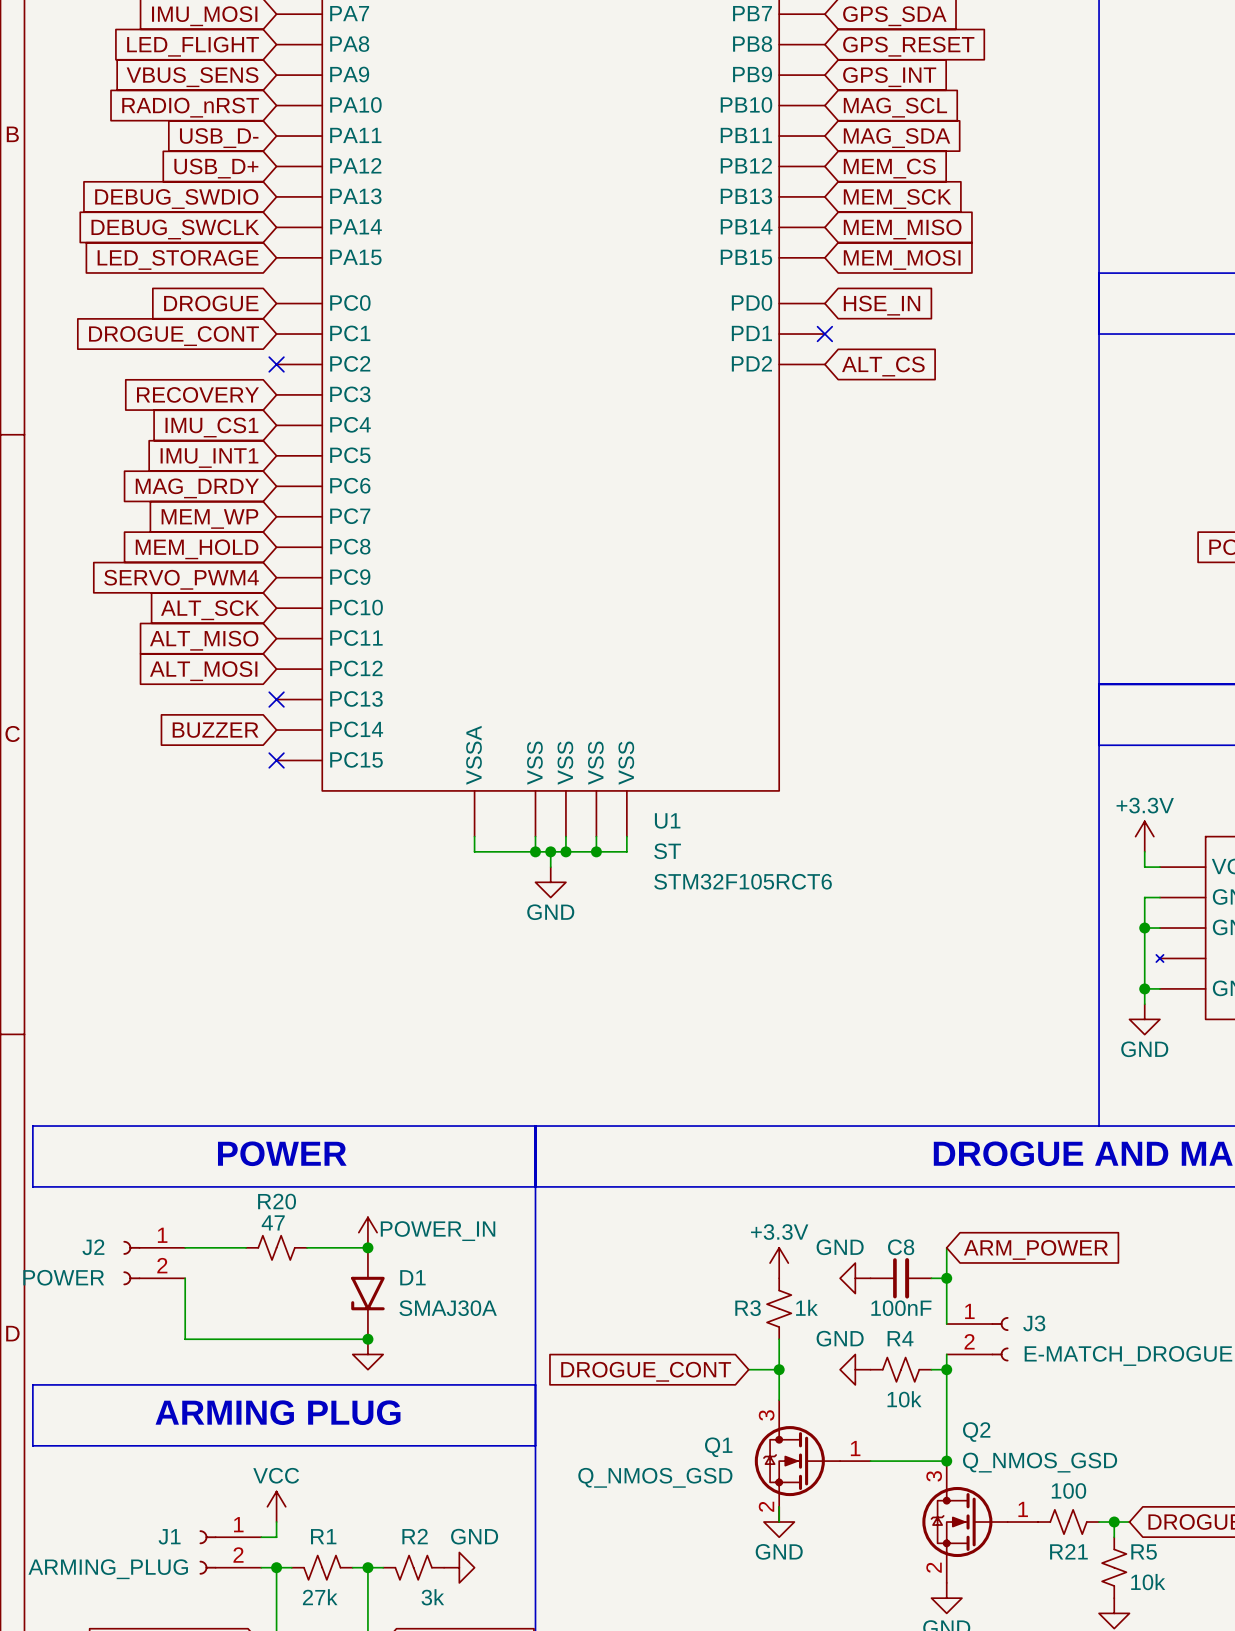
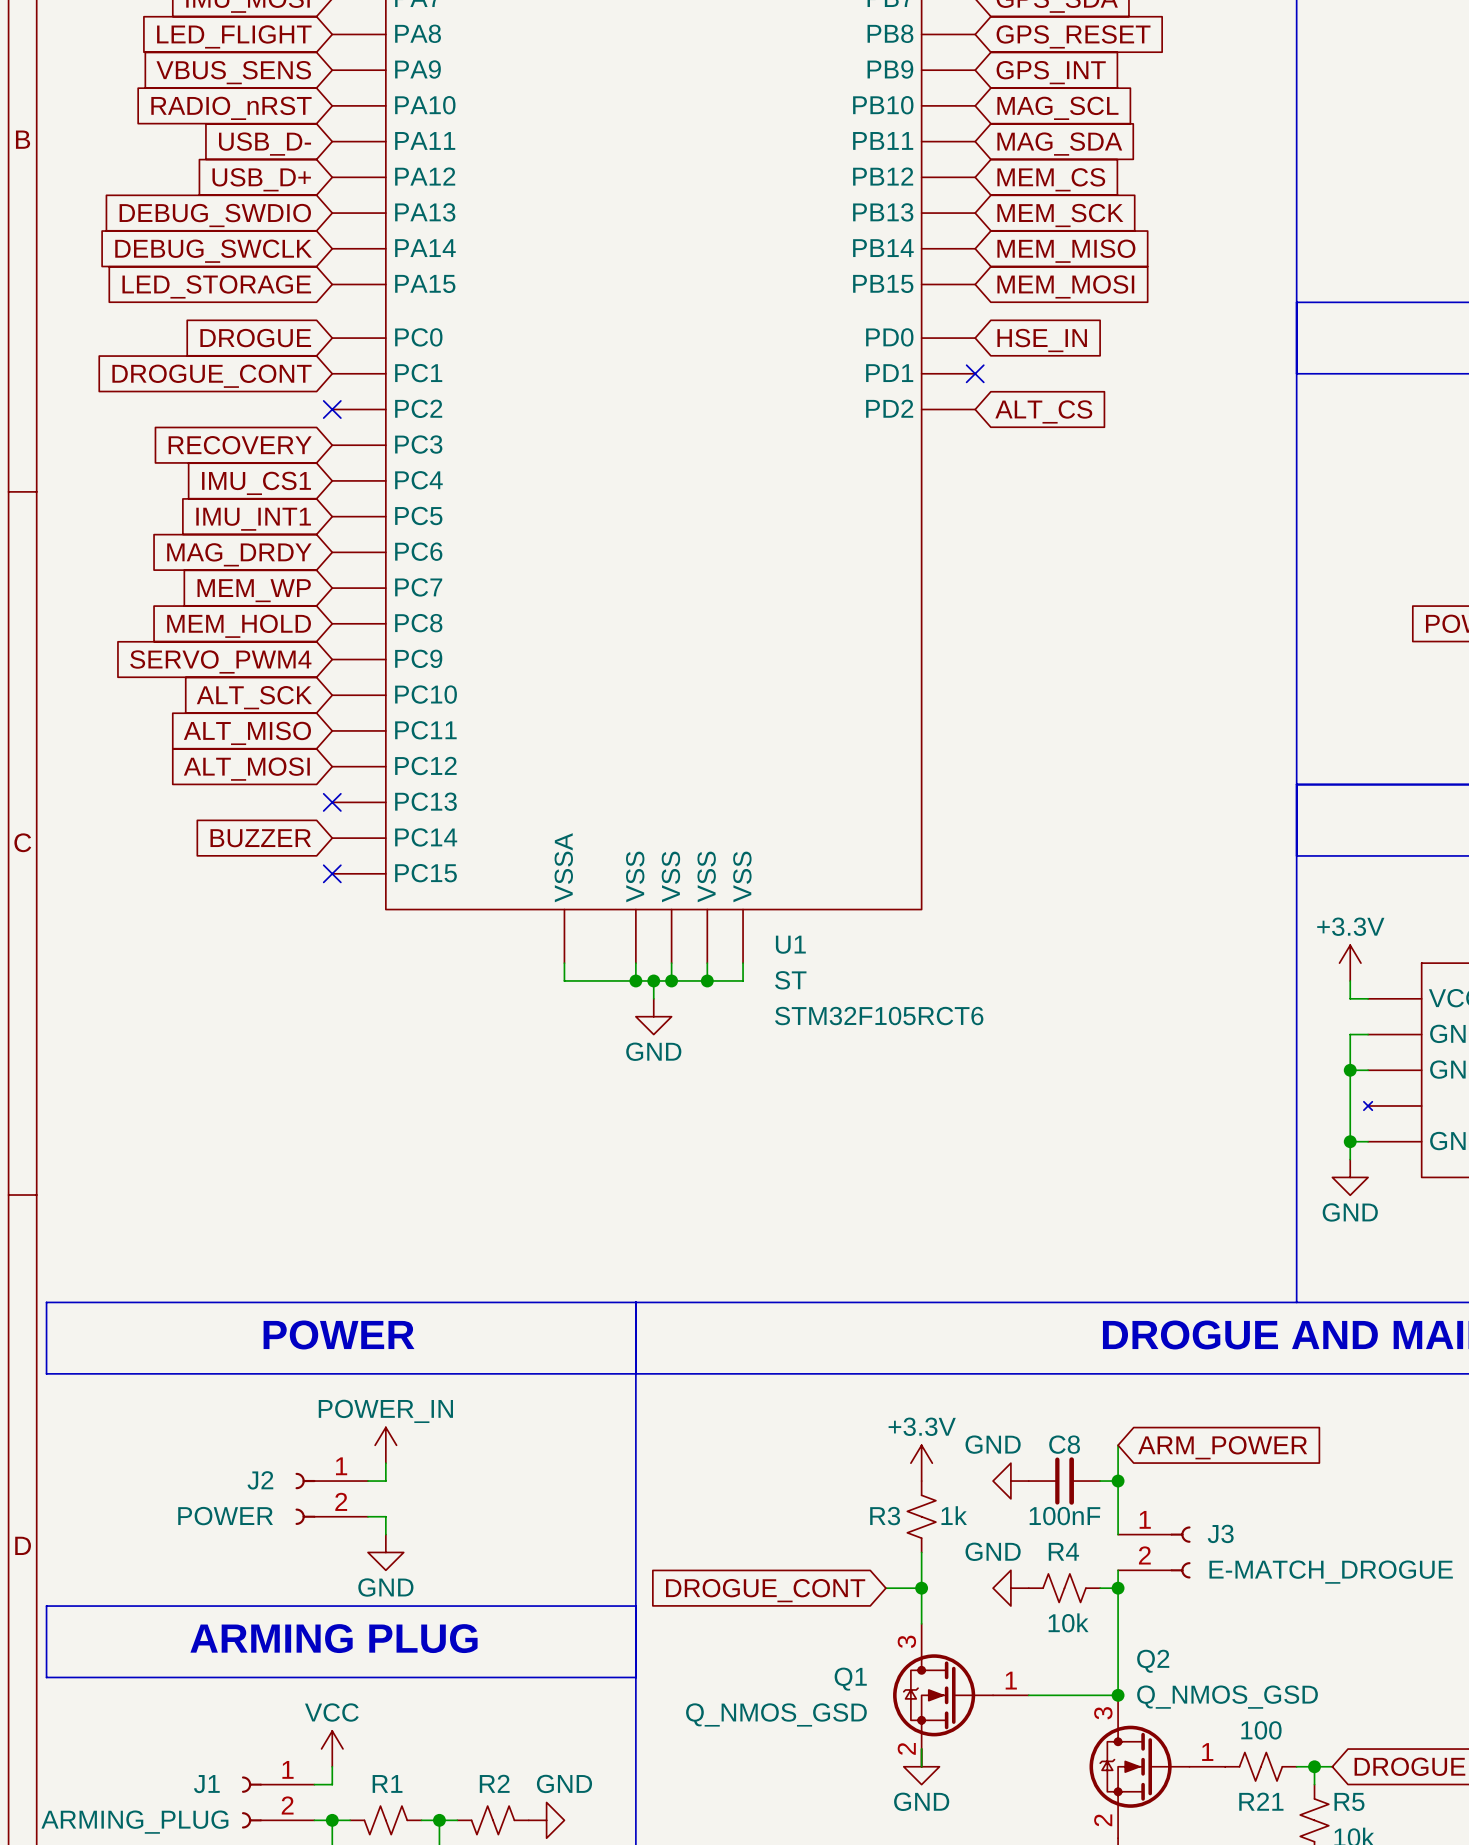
power symbol text position: POWER_IN (438, 1231) -> POWER_IN (385, 1411)
power symbol position: POWER_IN (367, 1232) -> POWER_IN (385, 1445)
wire: (185, 1247) (246, 1247) -> none
R20: 47 (276, 1247) -> none
wire: (307, 1247) (367, 1247) -> none
junction: (367, 1247) -> none
J2 position: (154, 1263) -> (331, 1498)
wire: none -> (385, 1463) (385, 1481) (368, 1481)
wire: (185, 1278) (185, 1339) (367, 1339) -> none
D1: SMAJ30A (367, 1293) -> none
wire: none -> (368, 1516) (385, 1516) (385, 1534)
power symbol: none -> GND (385, 1552)
junction: (367, 1339) -> none
power symbol: (367, 1354) -> none

